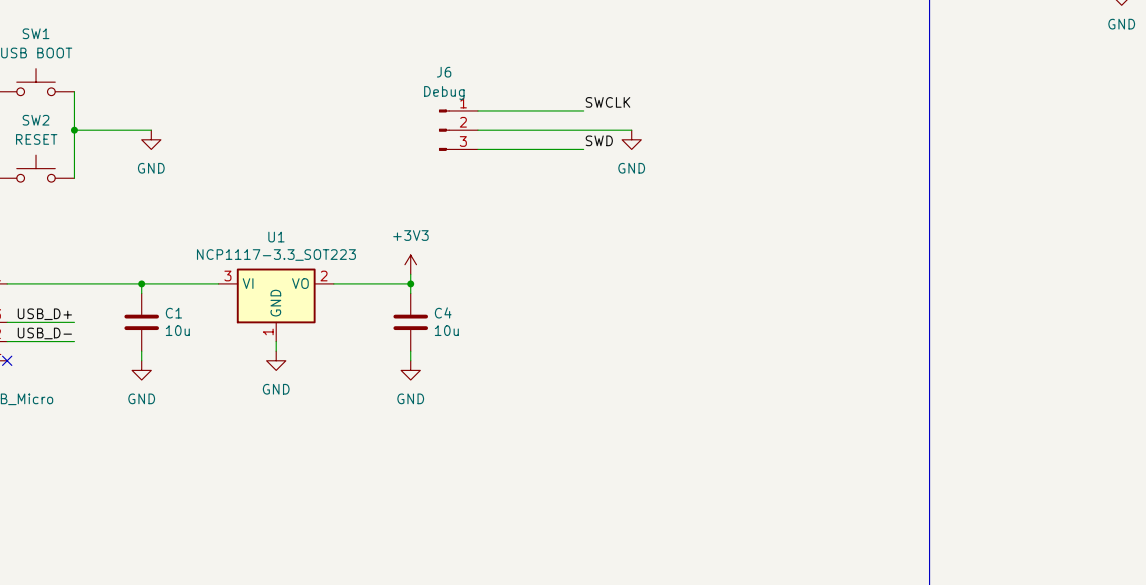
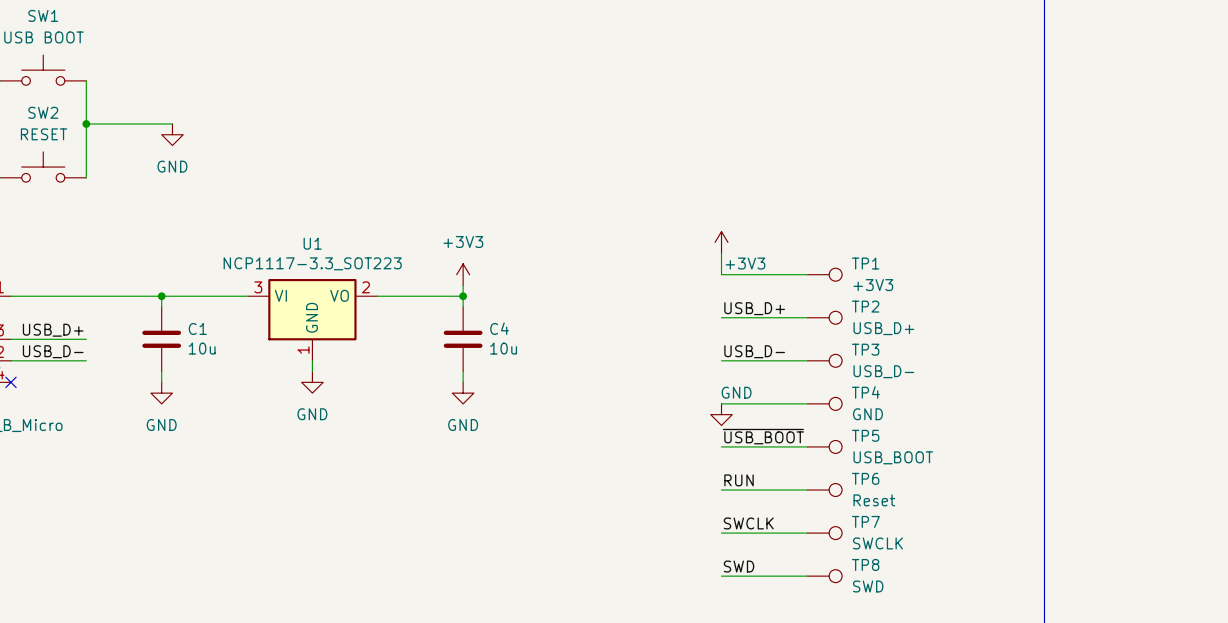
label: SWCLK (607, 102) -> none
wire: (477, 110) (583, 110) -> none
J6: Debug (458, 130) -> none
wire: (477, 130) (631, 130) -> none
power symbol: GND (631, 139) -> none
label: SWD (599, 140) -> none
wire: (477, 149) (583, 149) -> none
power symbol: none -> +3V3 (721, 242)
wire: none -> (721, 253) (721, 274) (807, 274)
TP1: none -> +3V3 (824, 274)
label: none -> USB_D+ (754, 308)
wire: none -> (721, 317) (807, 317)
TP2: none -> USB_D+ (824, 317)
label: none -> USB_D- (754, 351)
wire: none -> (721, 360) (807, 360)
TP3: none -> USB_D- (824, 360)
wire: none -> (721, 403) (807, 403)
TP4: none -> GND (824, 403)
power symbol: none -> GND (721, 414)
label: none -> ~{USB_BOOT} (763, 436)
wire: none -> (721, 446) (807, 446)
TP5: none -> USB_BOOT (824, 446)
label: none -> RUN (739, 480)
wire: none -> (721, 490) (807, 490)
TP6: none -> Reset (824, 490)
label: none -> SWCLK (748, 523)
wire: none -> (721, 533) (807, 533)
TP7: none -> SWCLK (824, 533)
label: none -> SWD (739, 566)
wire: none -> (721, 576) (807, 576)
TP8: none -> SWD (824, 576)

